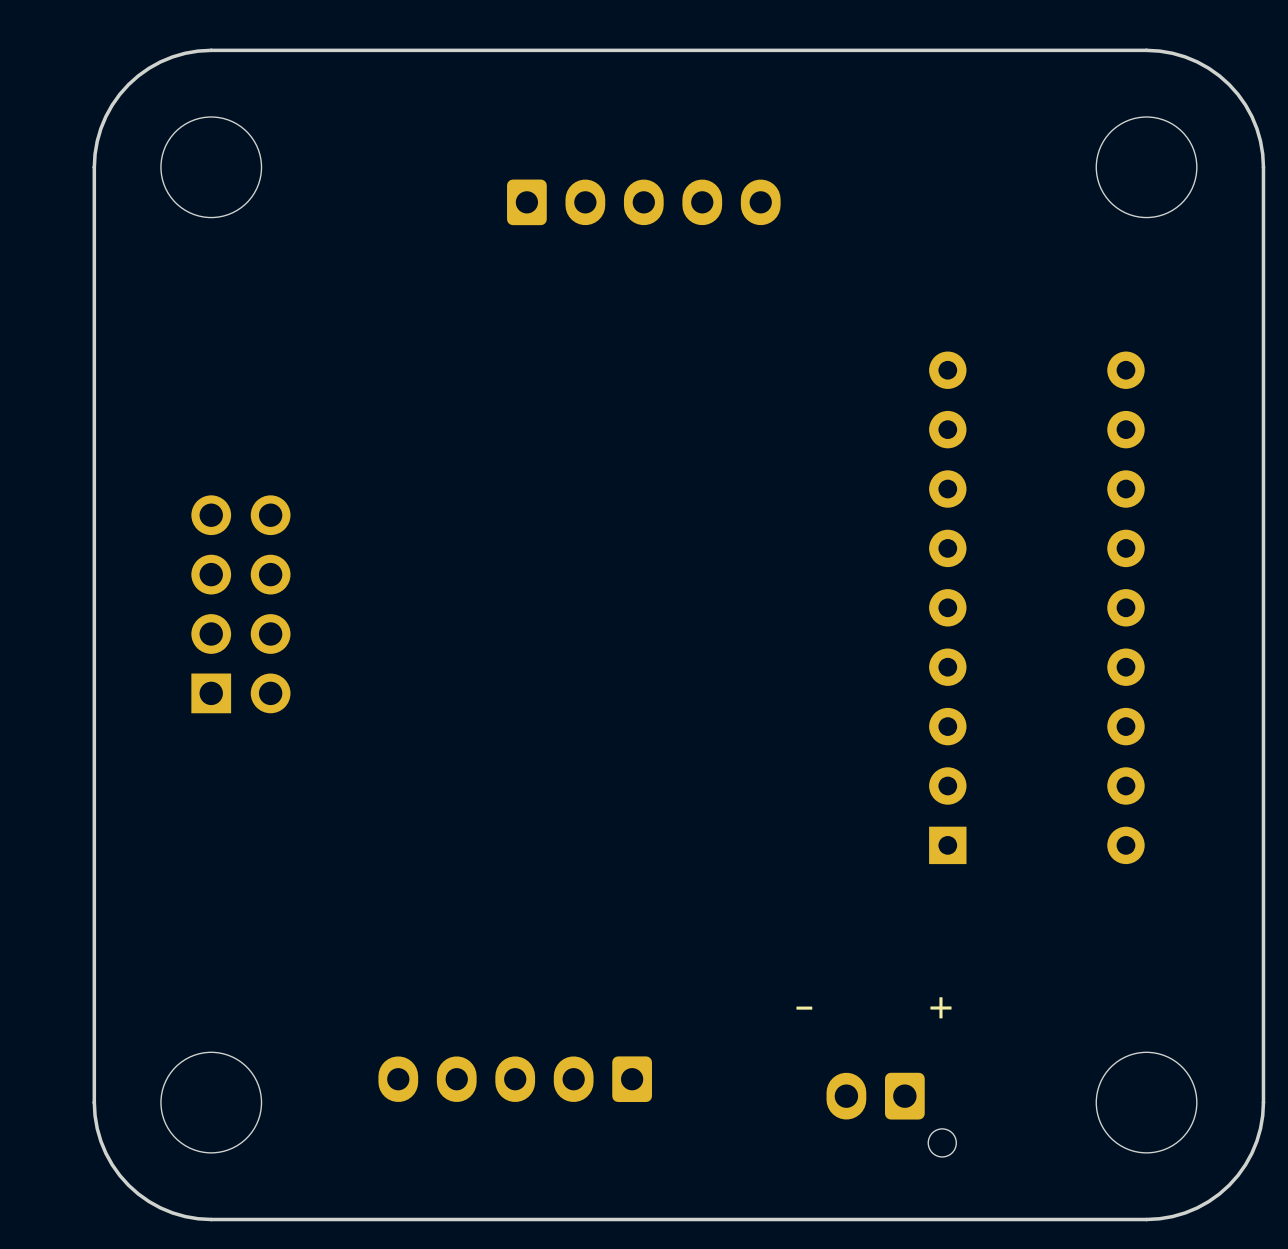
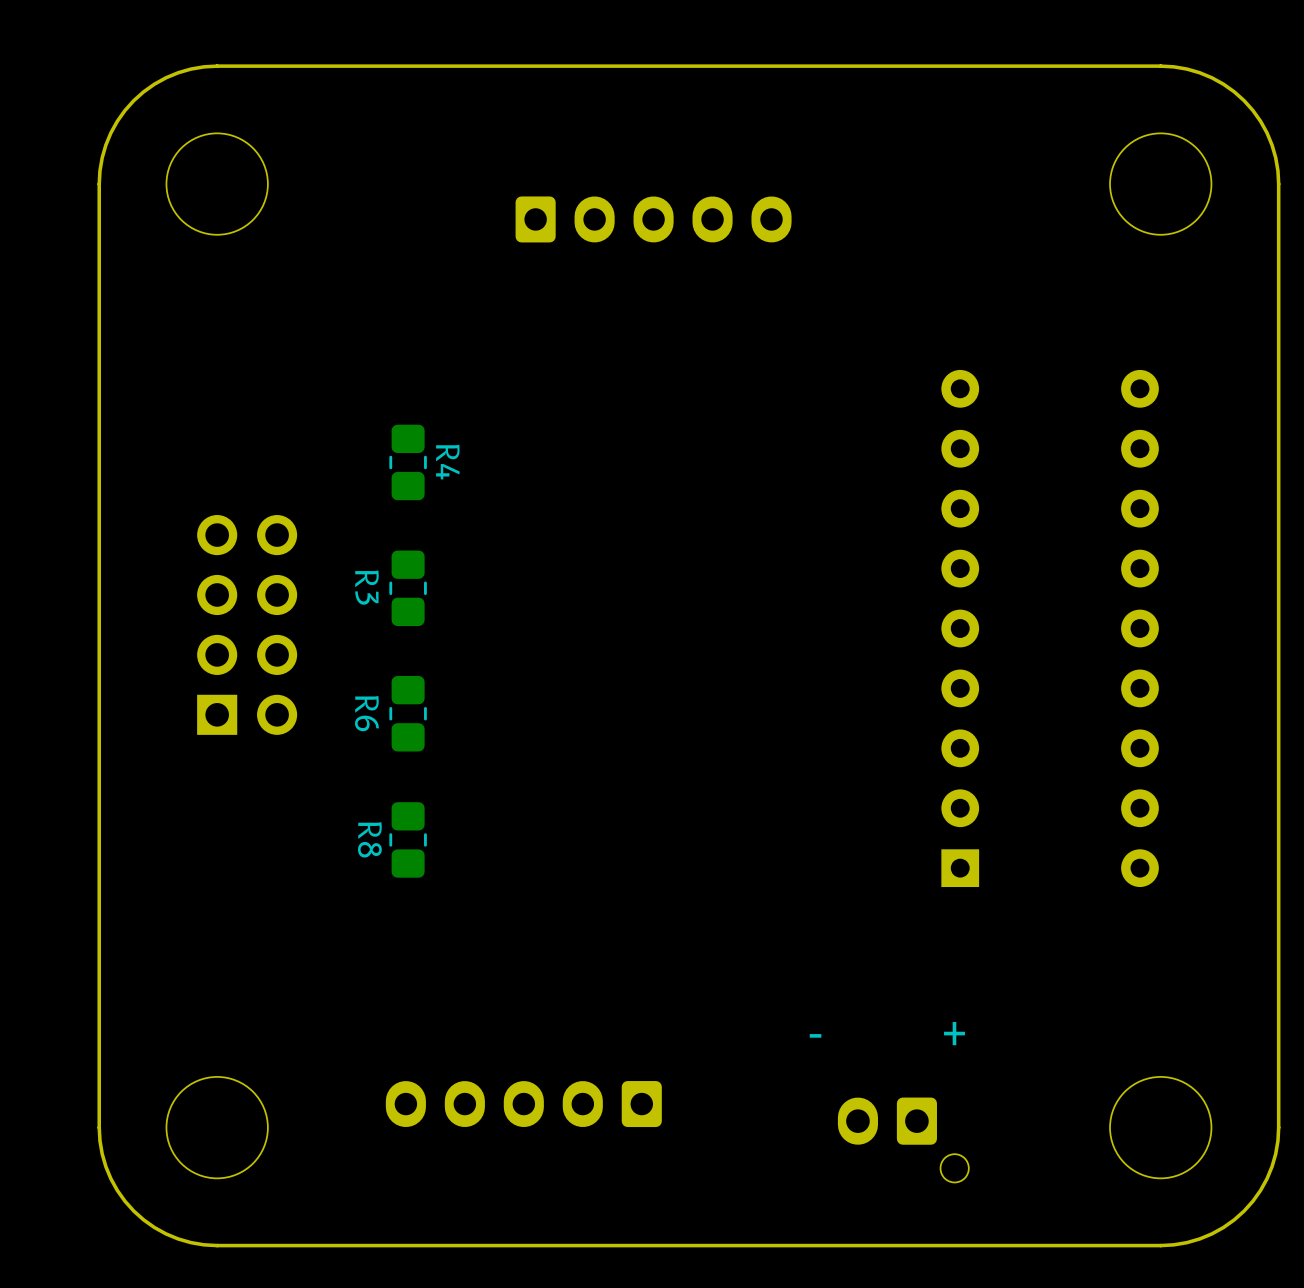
R4: none -> (408, 462)
R3: none -> (408, 588)
R6: none -> (408, 713)
R8: none -> (408, 839)

